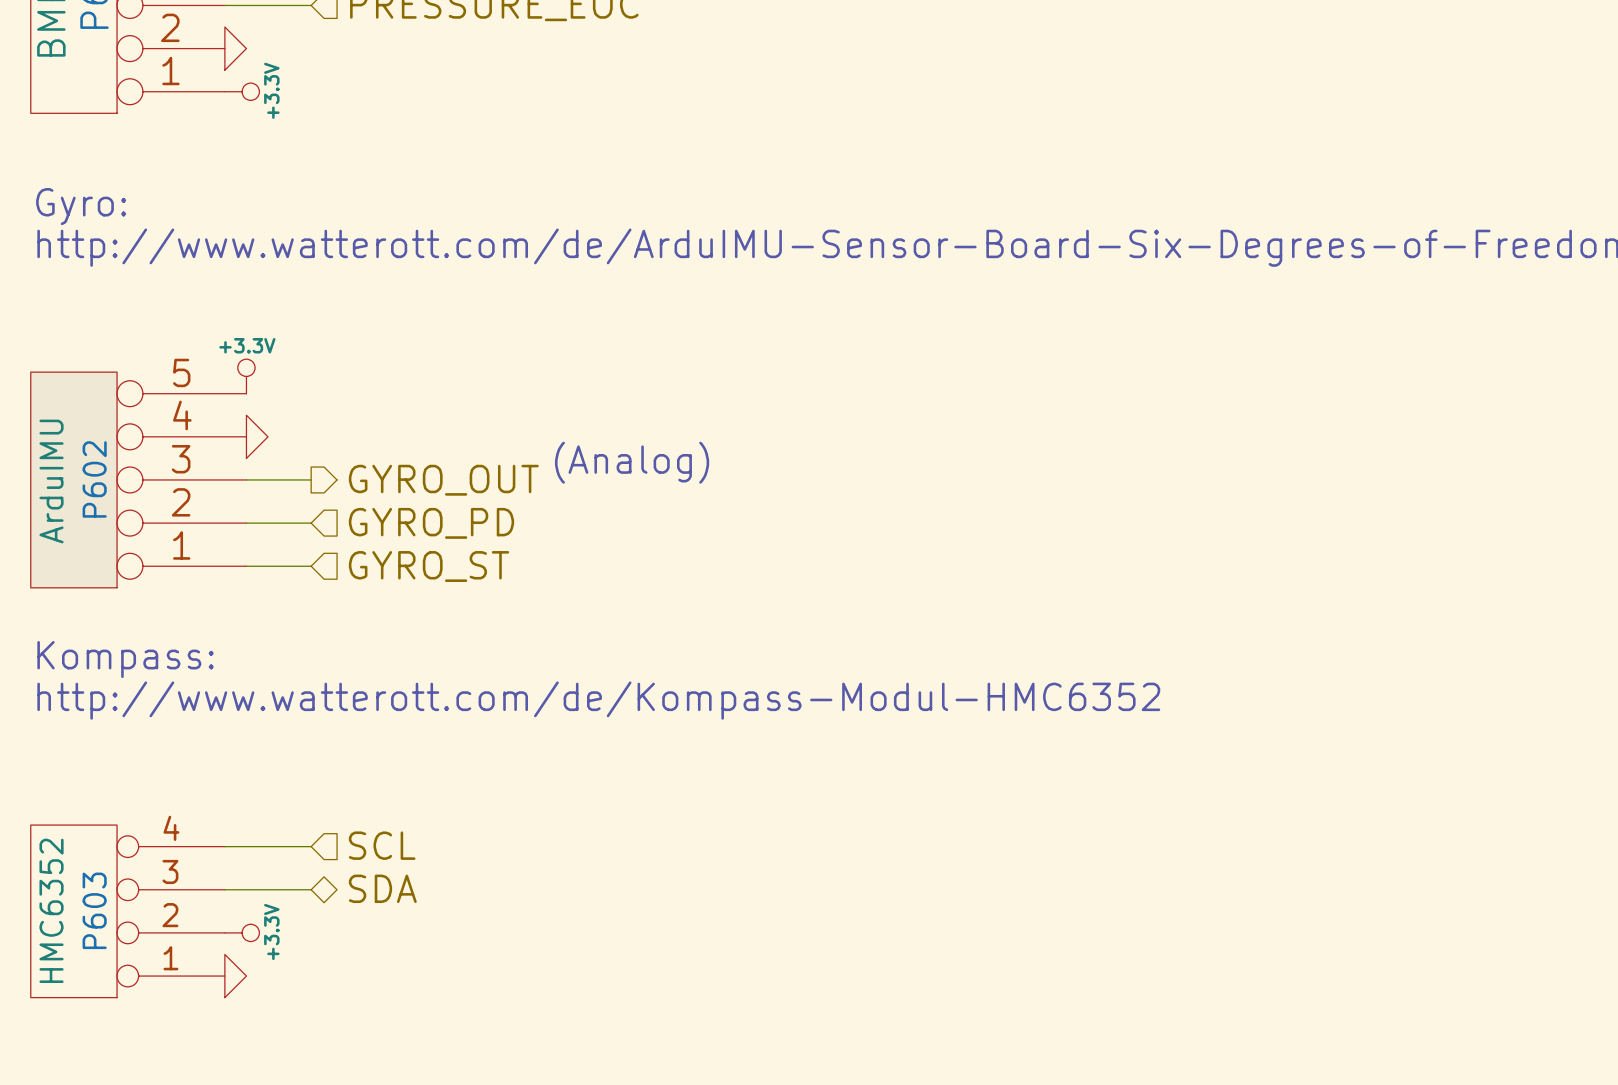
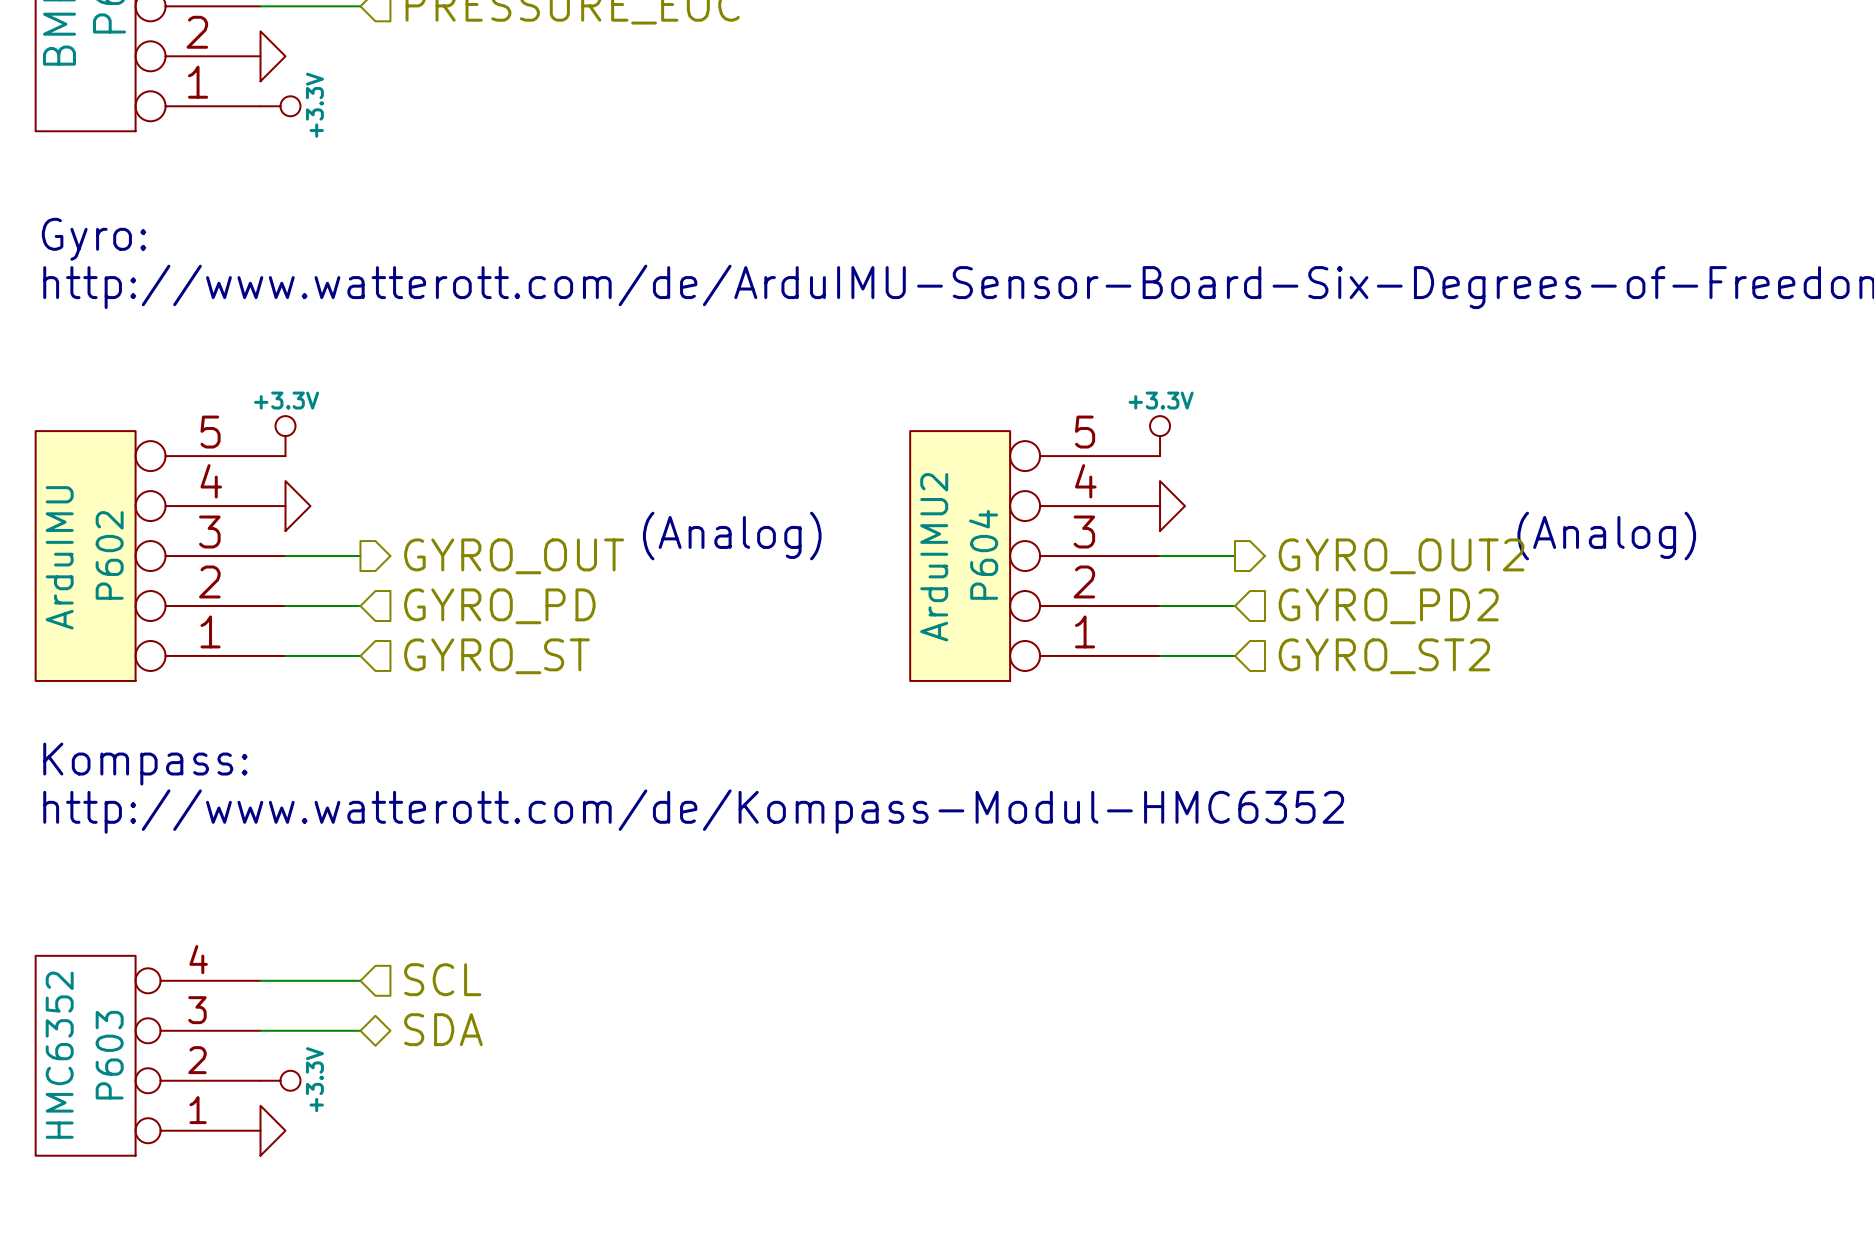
power symbol: none -> +3.3V (1160, 436)
power symbol: none -> (1172, 506)
text: none -> (Analog) (1606, 536)
P604: none -> ArduIMU2 (1035, 556)
wire: none -> (1160, 556) (1234, 556)
hierarchical label: none -> GYRO_OUT2 (1401, 556)
wire: none -> (1160, 606) (1234, 606)
hierarchical label: none -> GYRO_PD2 (1388, 606)
wire: none -> (1160, 655) (1234, 655)
hierarchical label: none -> GYRO_ST2 (1384, 656)

